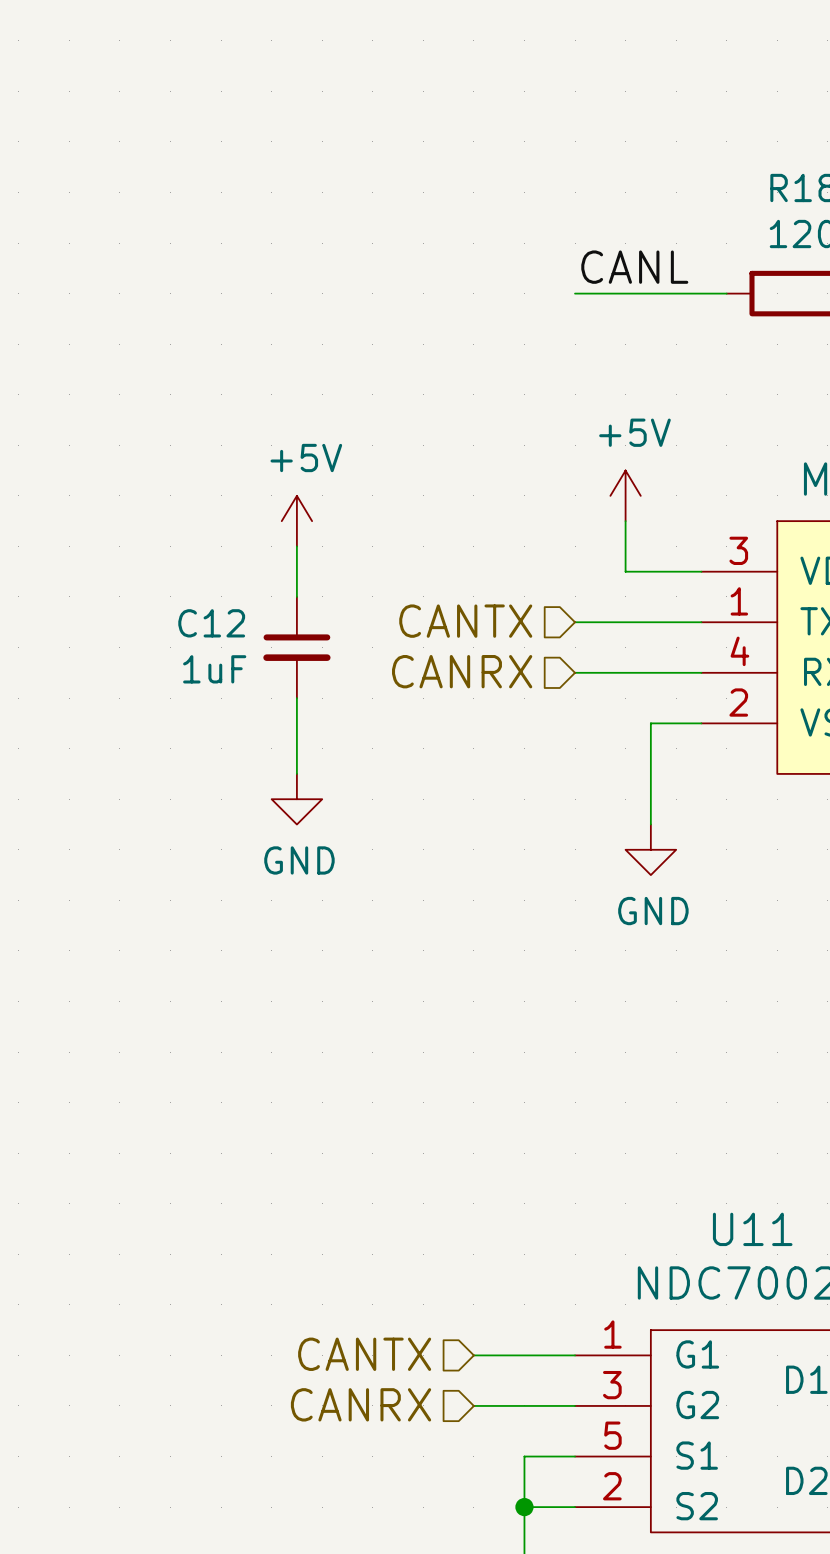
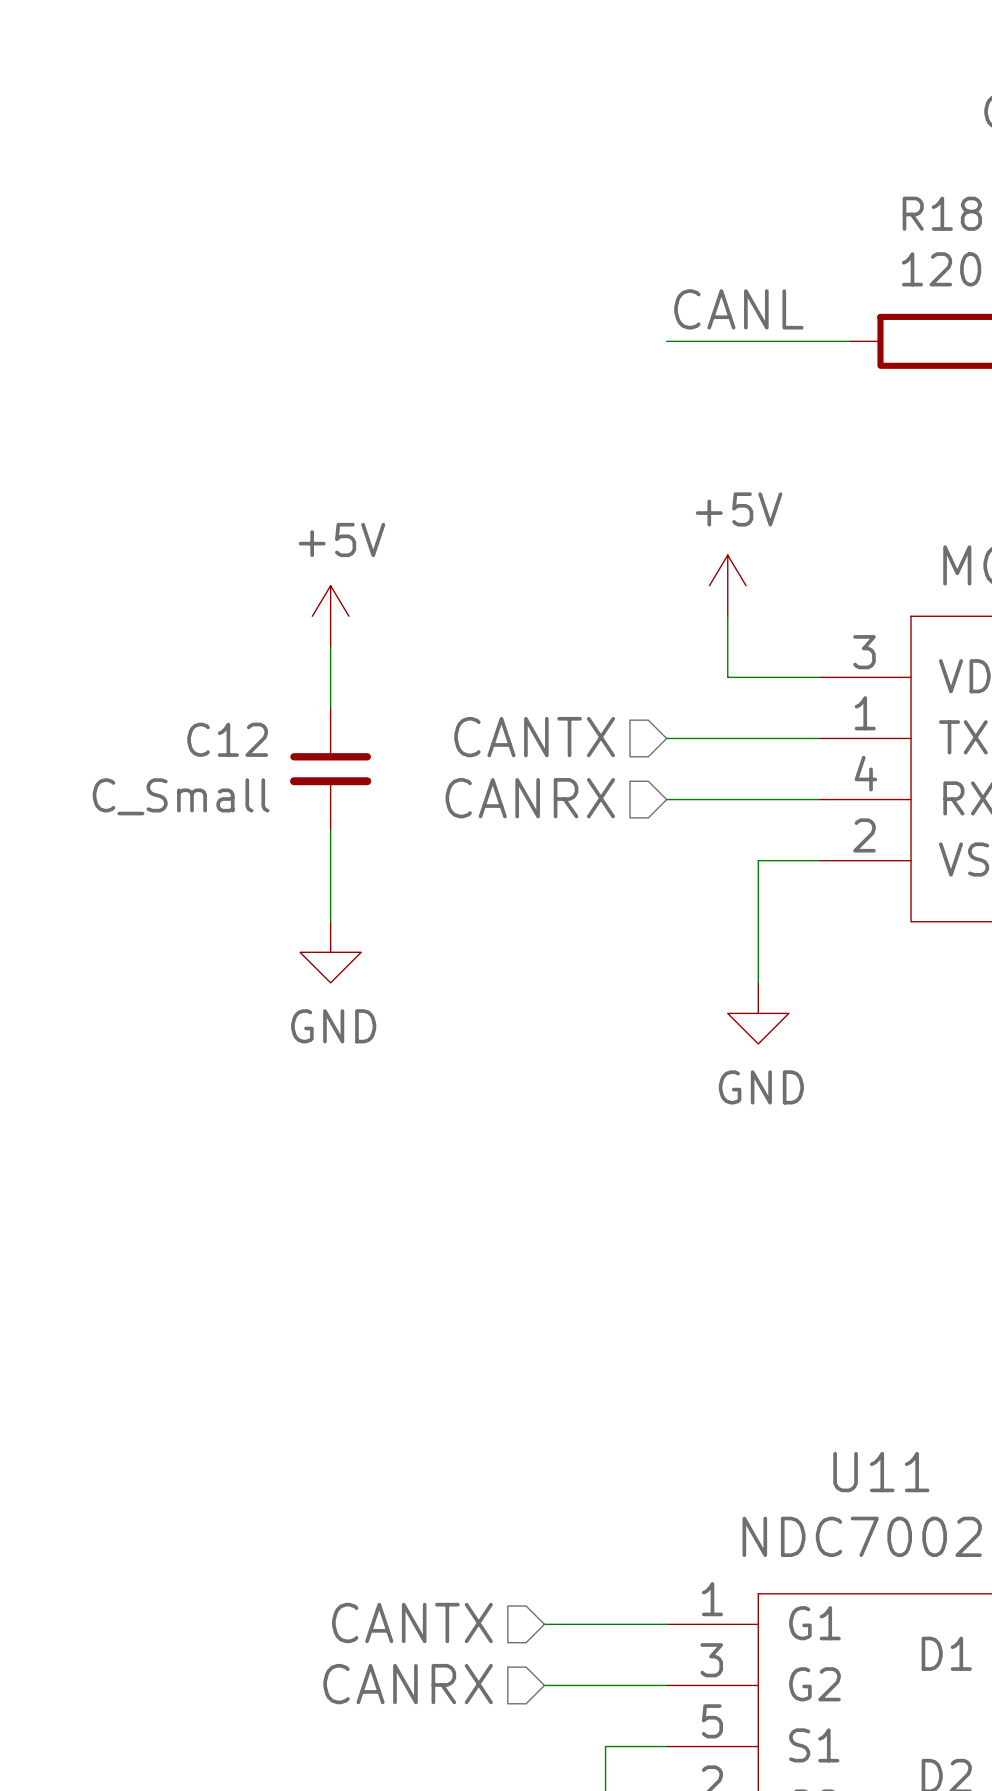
C12 value: 1uF (214, 669) -> C_Small (181, 796)

